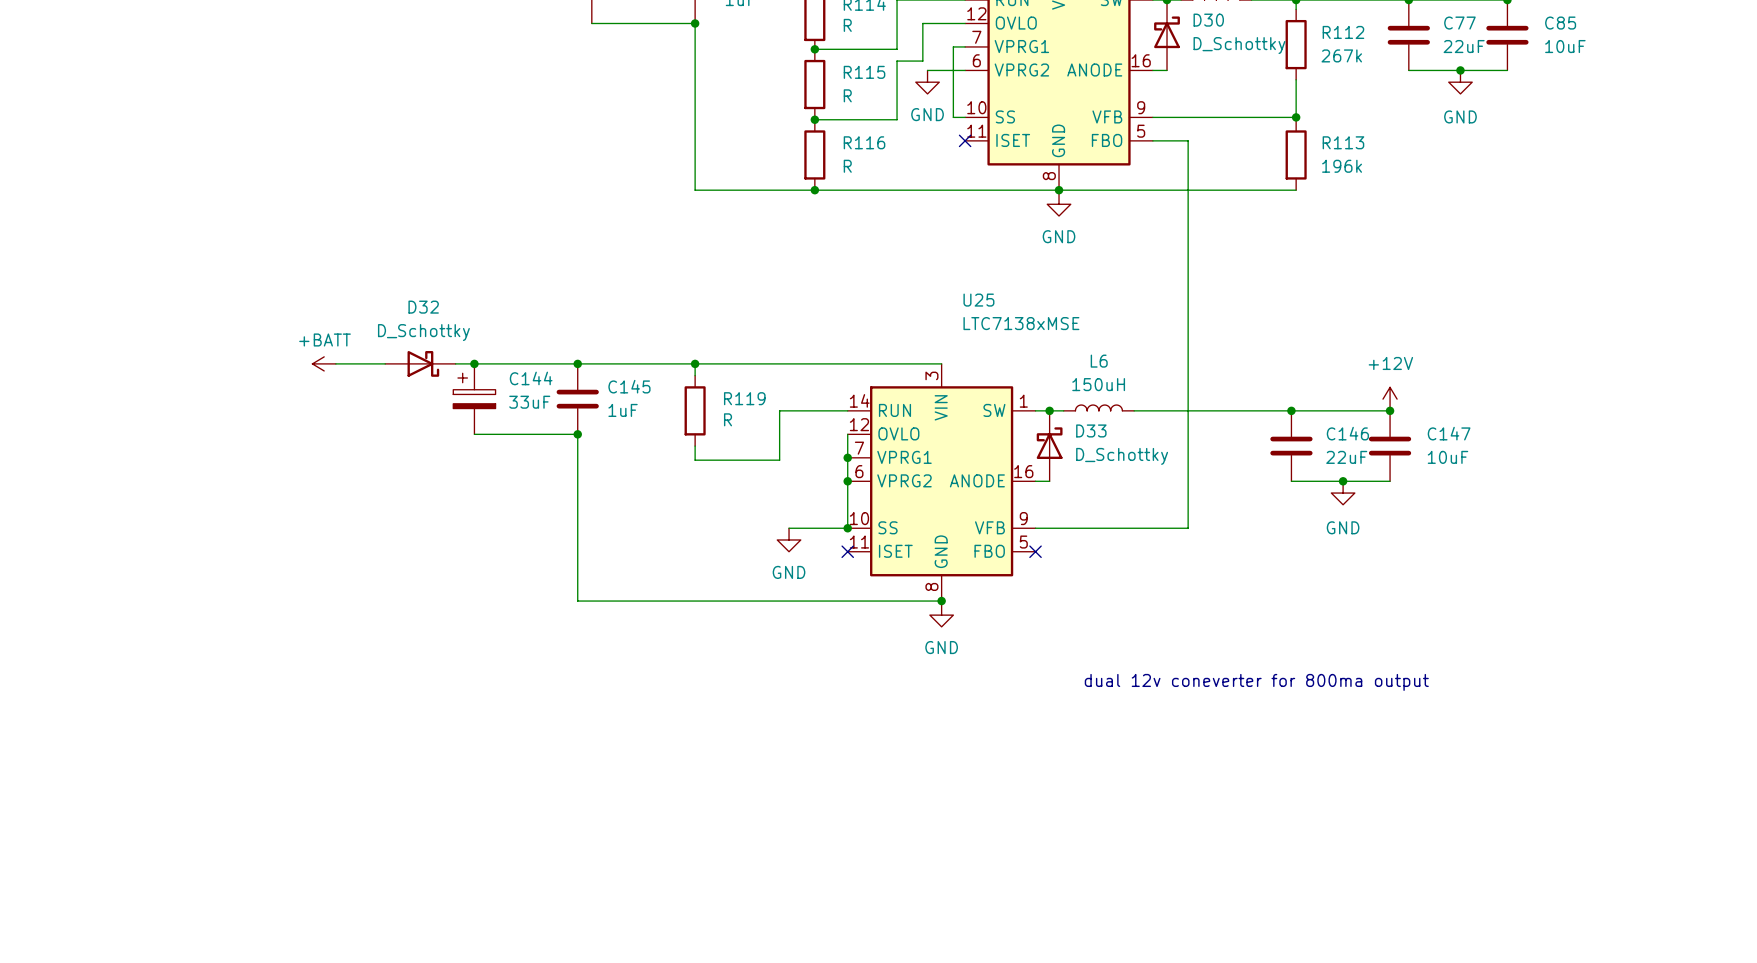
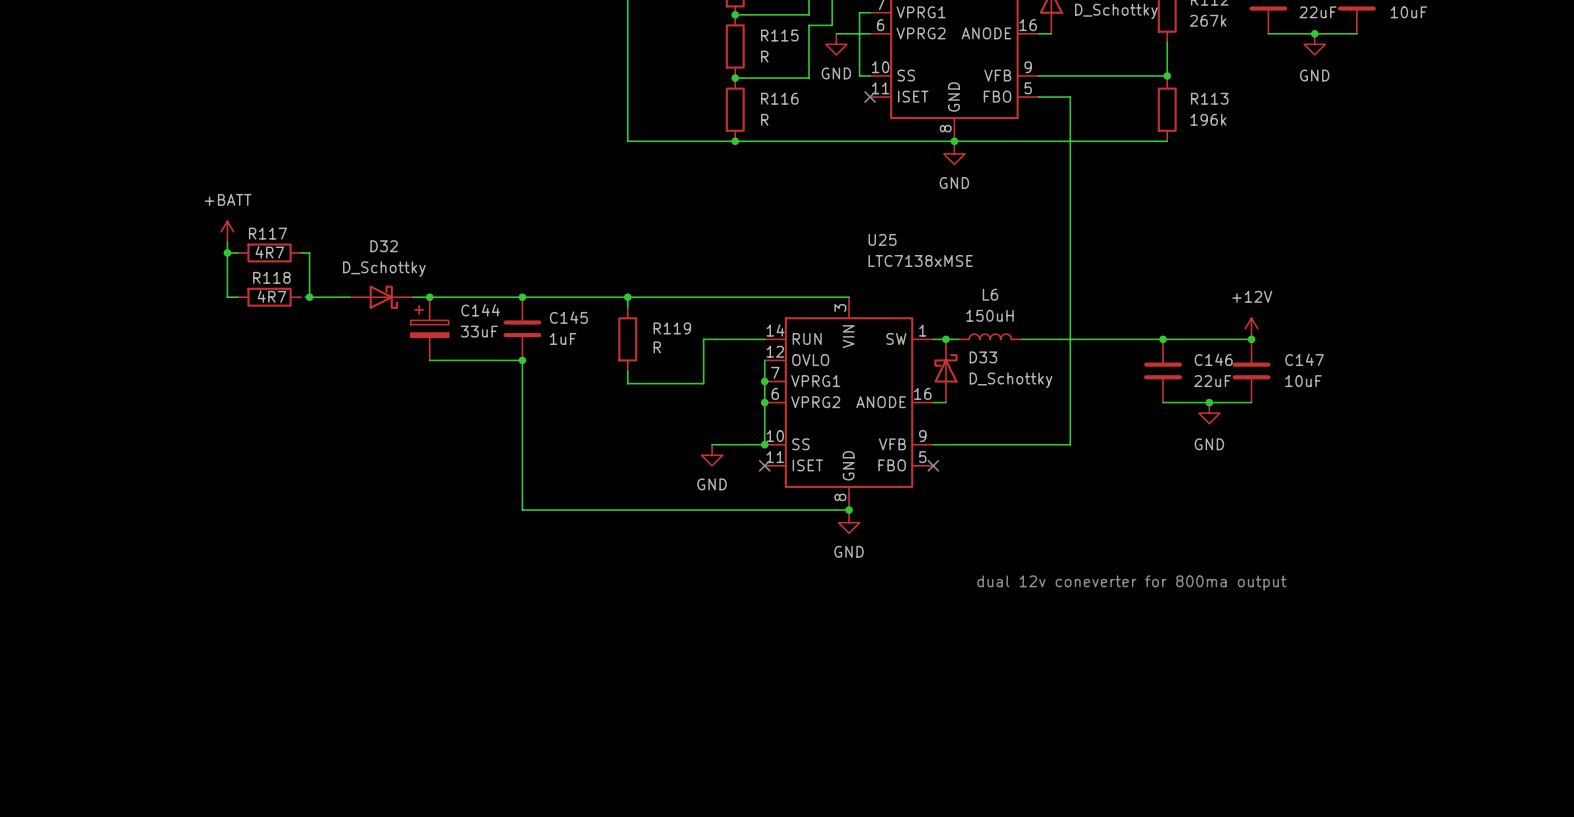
wire: none -> (227, 242) (227, 297) (237, 297)
wire: none -> (227, 252) (237, 252)
junction: none -> (227, 252)
R117: none -> 4R7 (269, 252)
wire: none -> (301, 252) (309, 252) (309, 297)
R118: none -> 4R7 (269, 297)
power symbol rotation: 0° (324, 363) -> 90° clockwise (227, 231)
power symbol position: +BATT (324, 363) -> +BATT (227, 231)
junction: none -> (309, 297)

